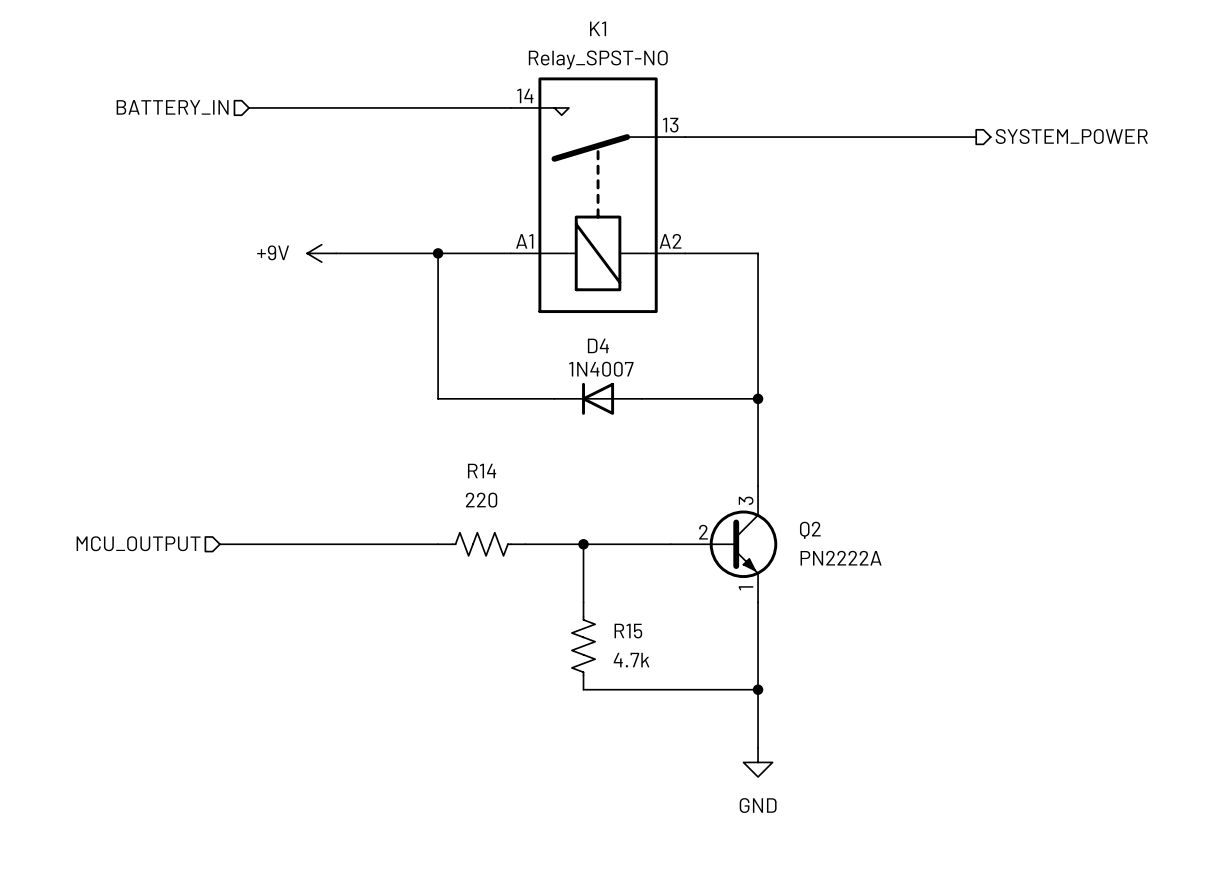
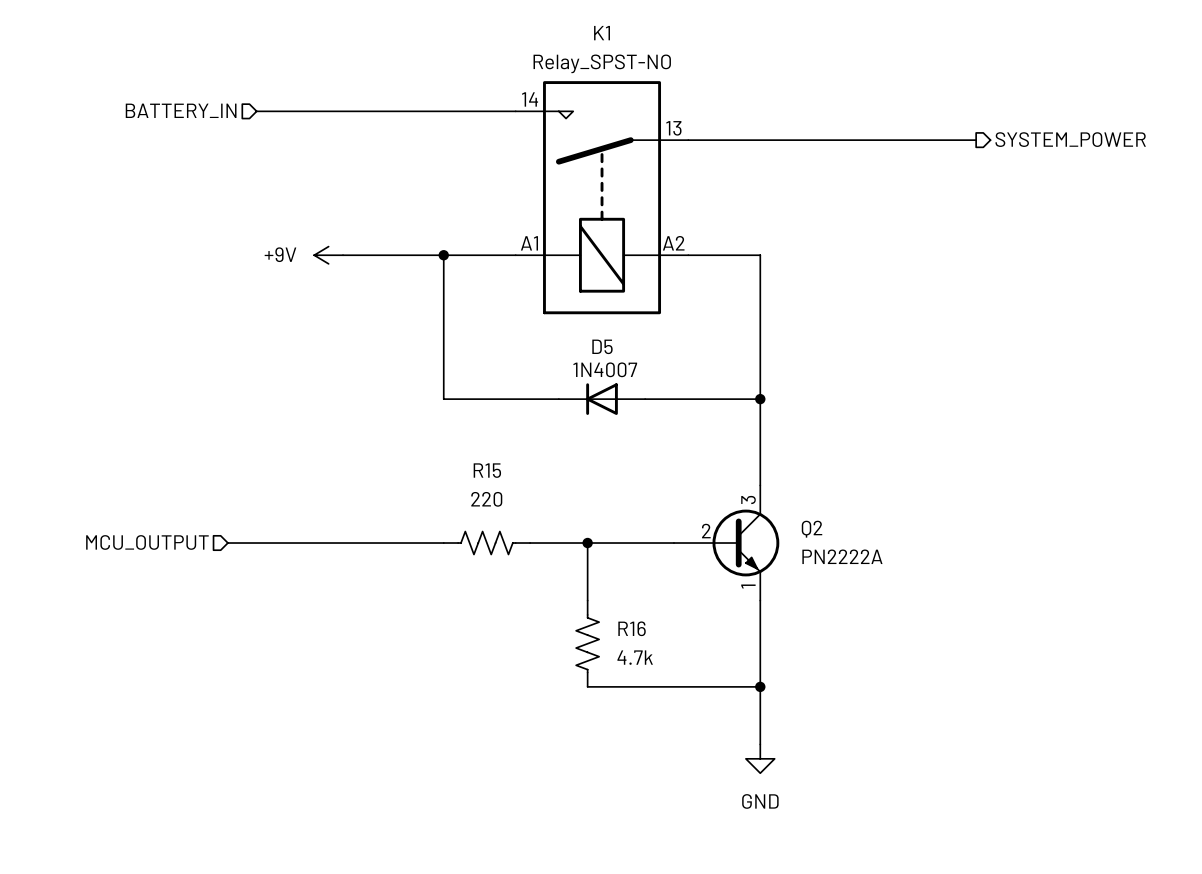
D4 name: D4 (598, 345) -> D5 (602, 346)
R14 name: R14 (482, 471) -> R15 (487, 470)
R15 name: R15 (628, 631) -> R16 (632, 628)

